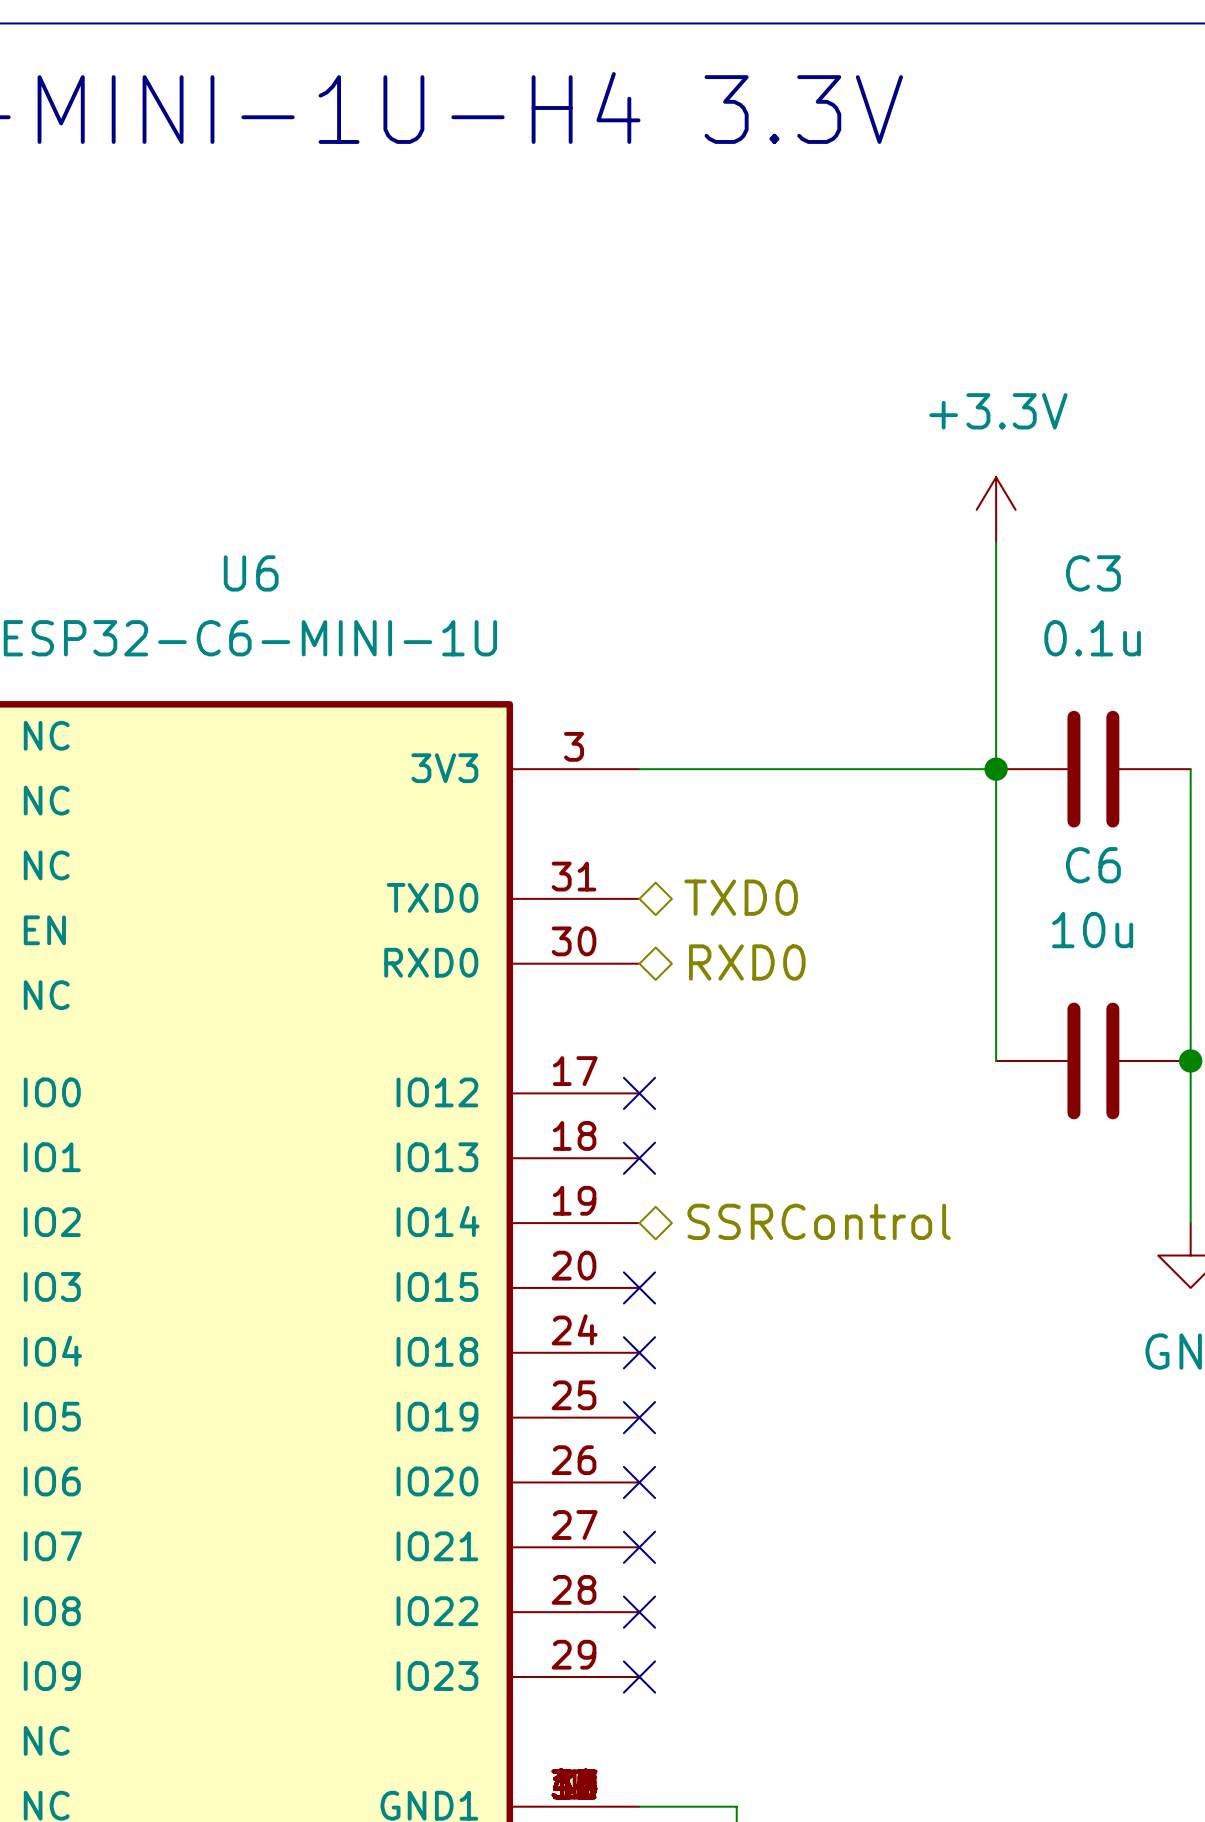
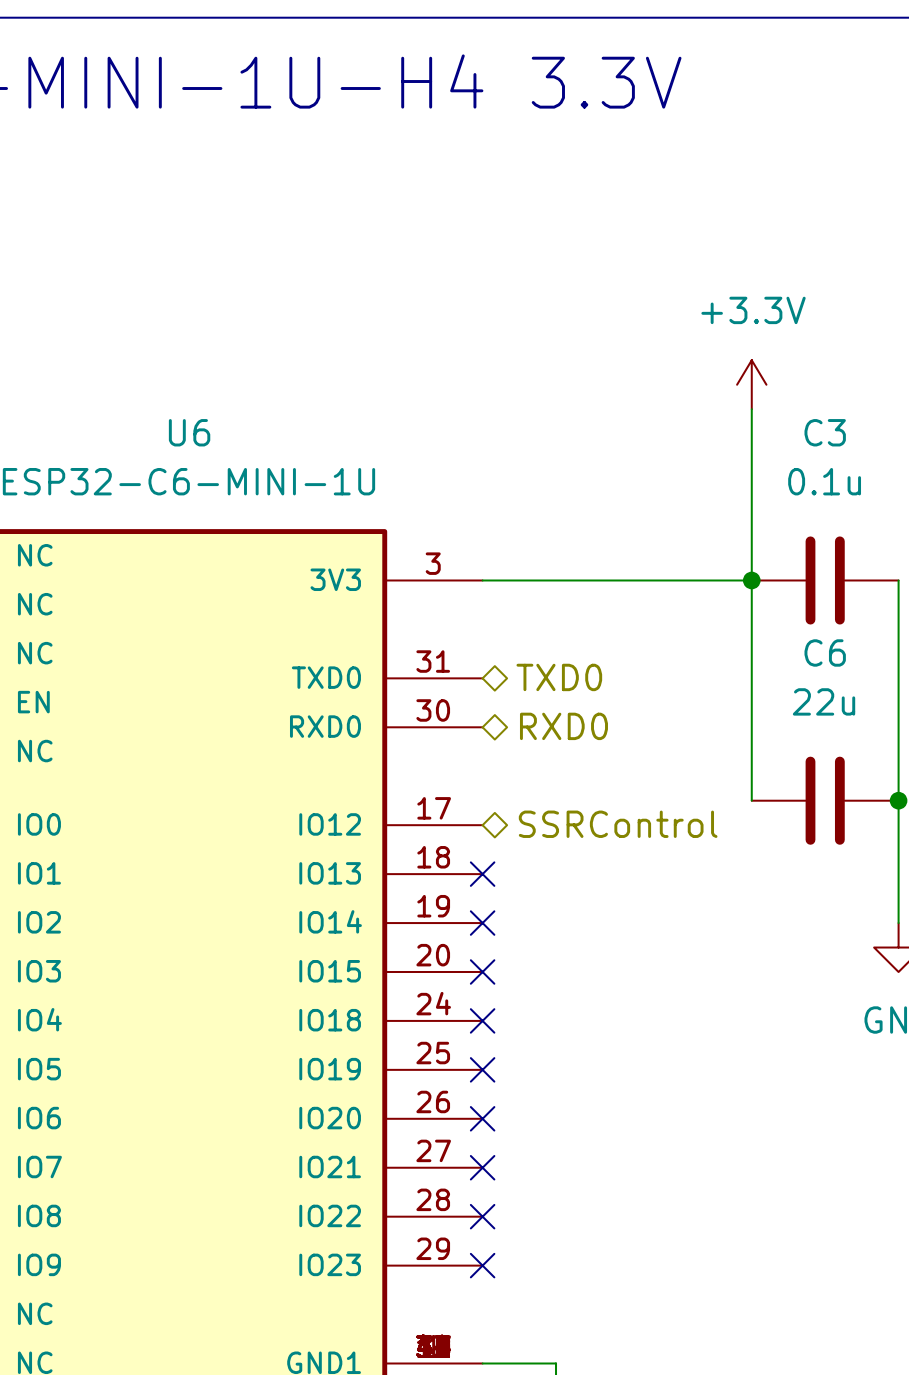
C6 value: 10u (1092, 930) -> 22u (824, 701)
no-connect mark position: (639, 1093) -> (482, 923)
hierarchical label position: SSRControl (819, 1221) -> SSRControl (618, 824)

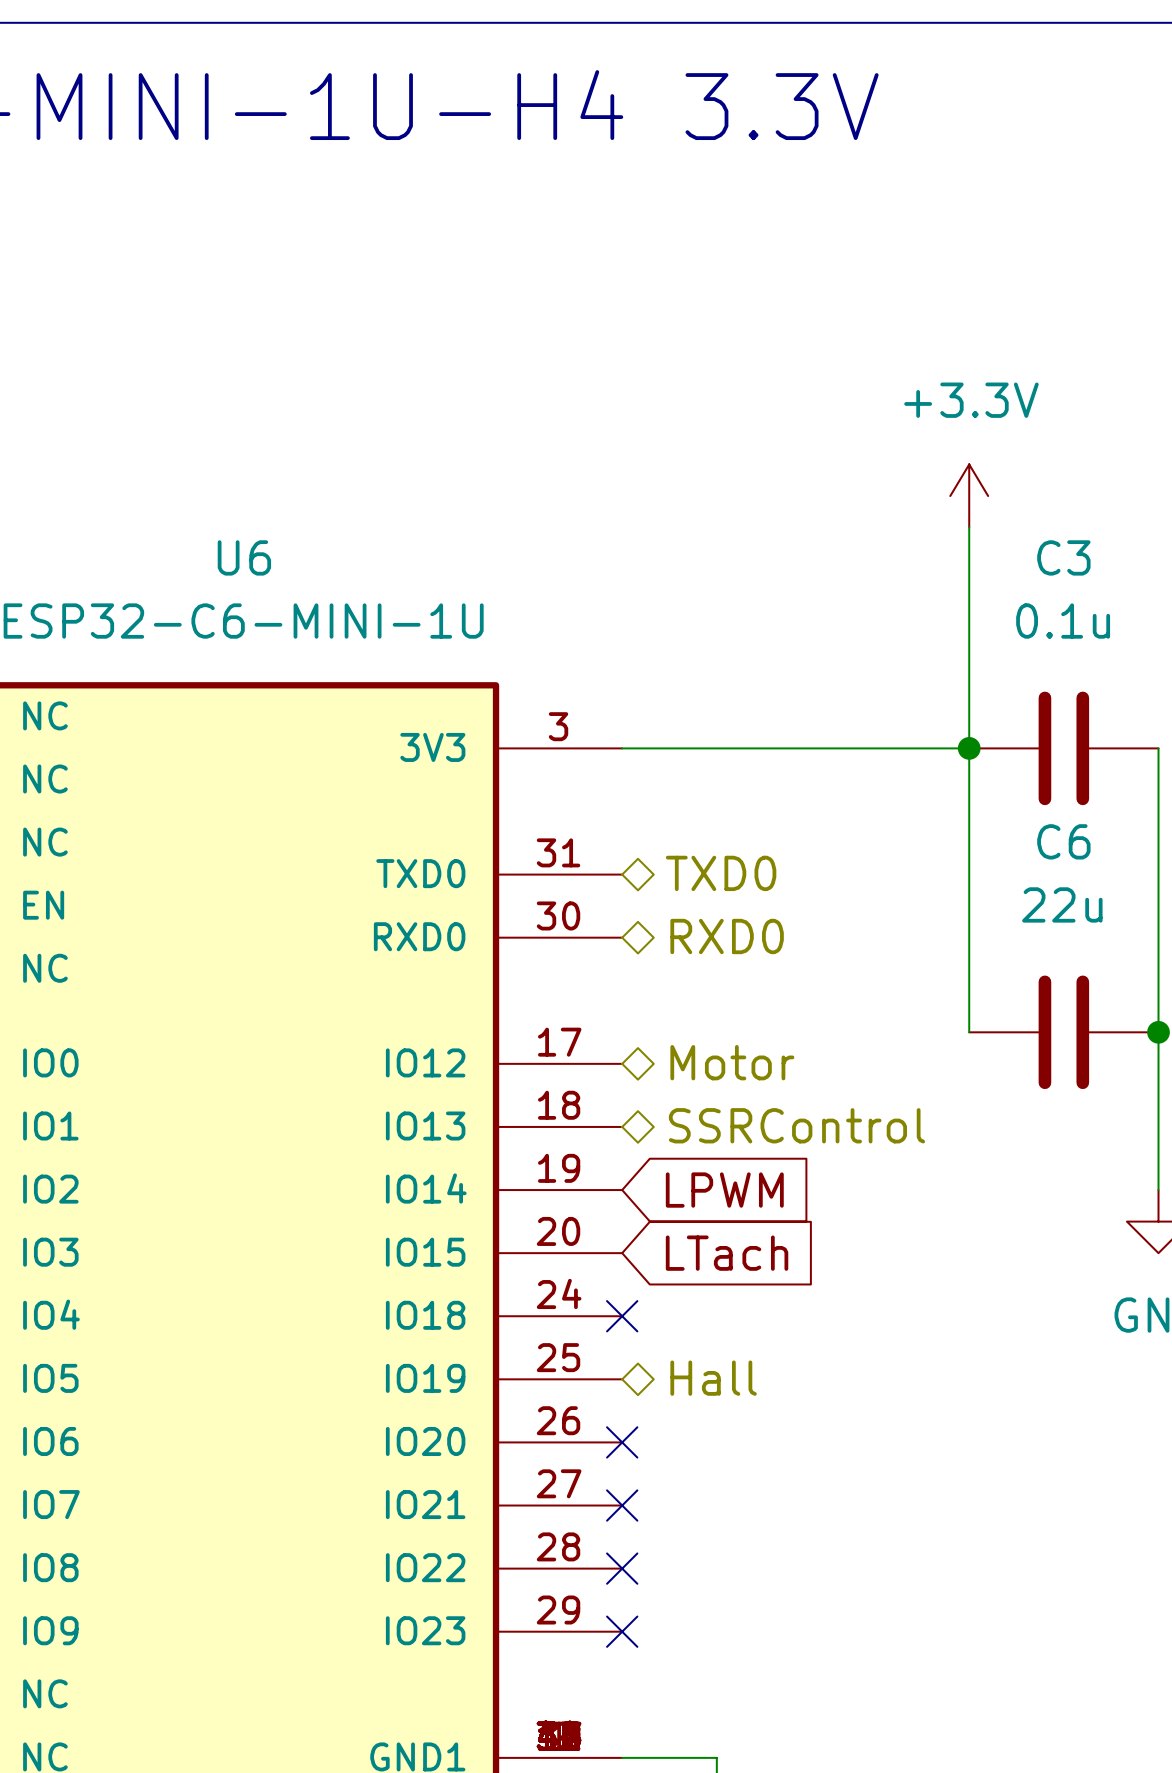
hierarchical label: SSRControl (618, 824) -> Motor (732, 1062)
hierarchical label: none -> SSRControl (796, 1125)
no-connect mark: (482, 874) -> none
no-connect mark: (482, 923) -> none
global label: none -> LPWM (724, 1190)
no-connect mark: (482, 971) -> none
global label: none -> LTach (727, 1253)
hierarchical label: none -> Hall (713, 1378)
no-connect mark: (482, 1069) -> none

